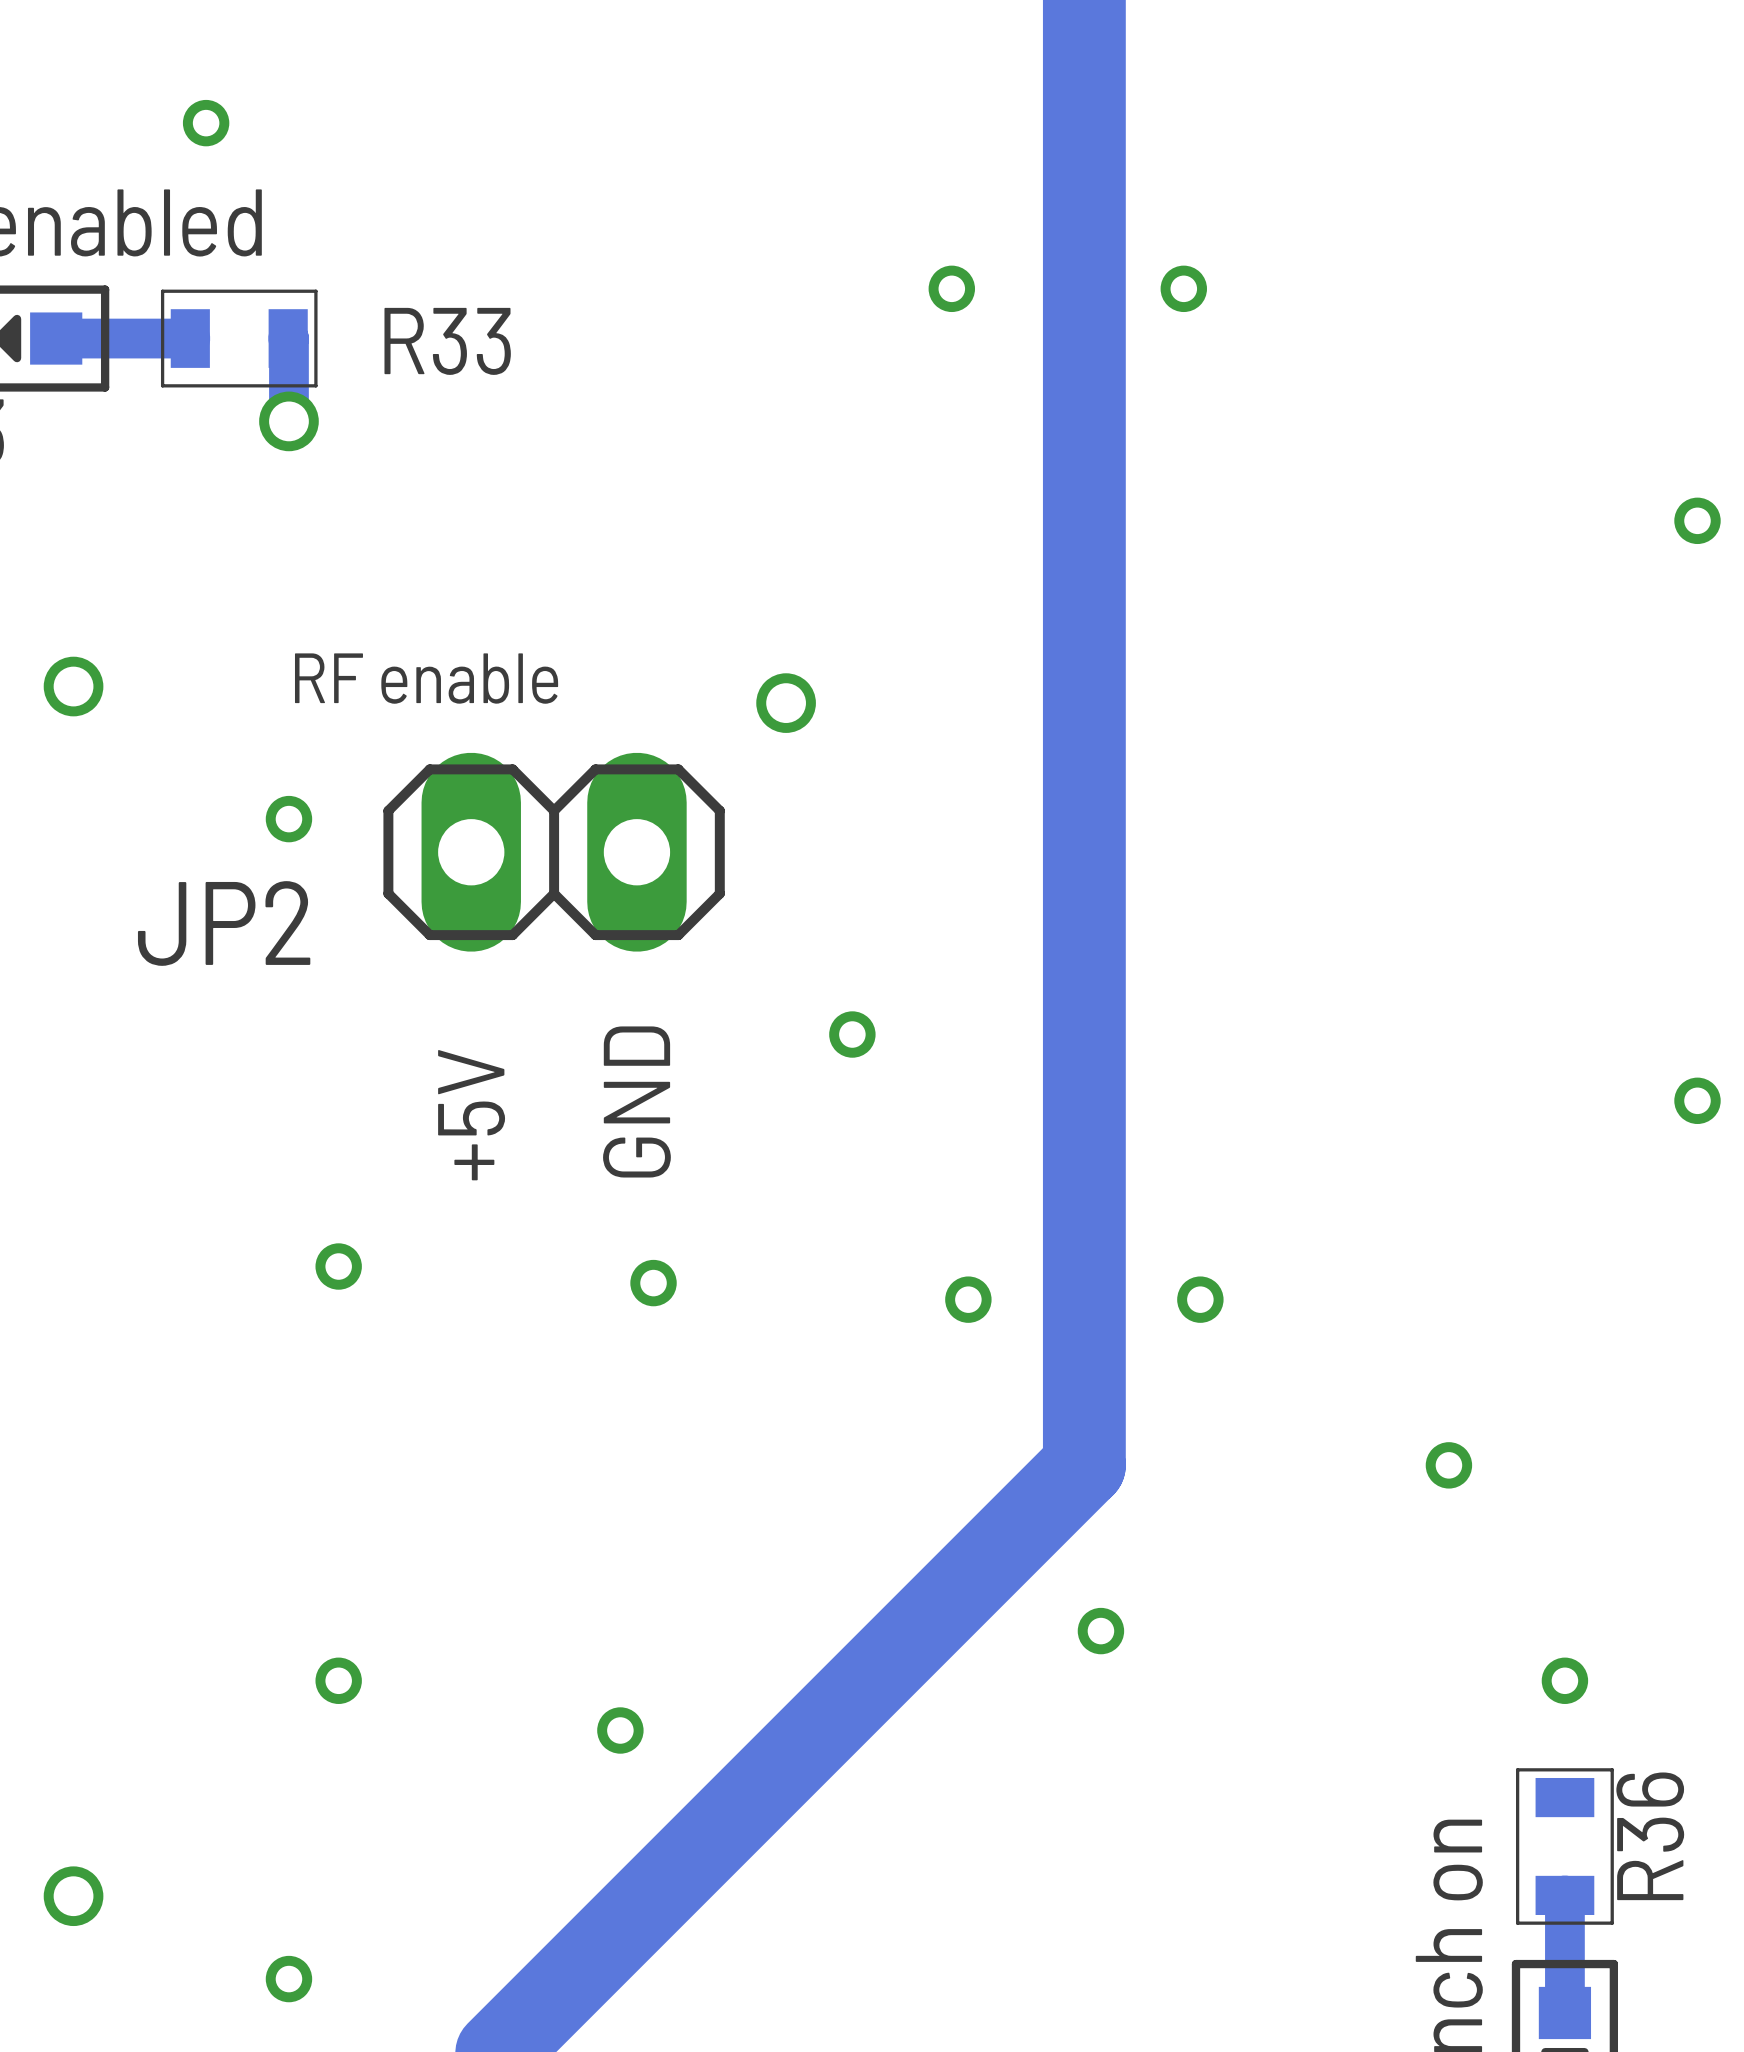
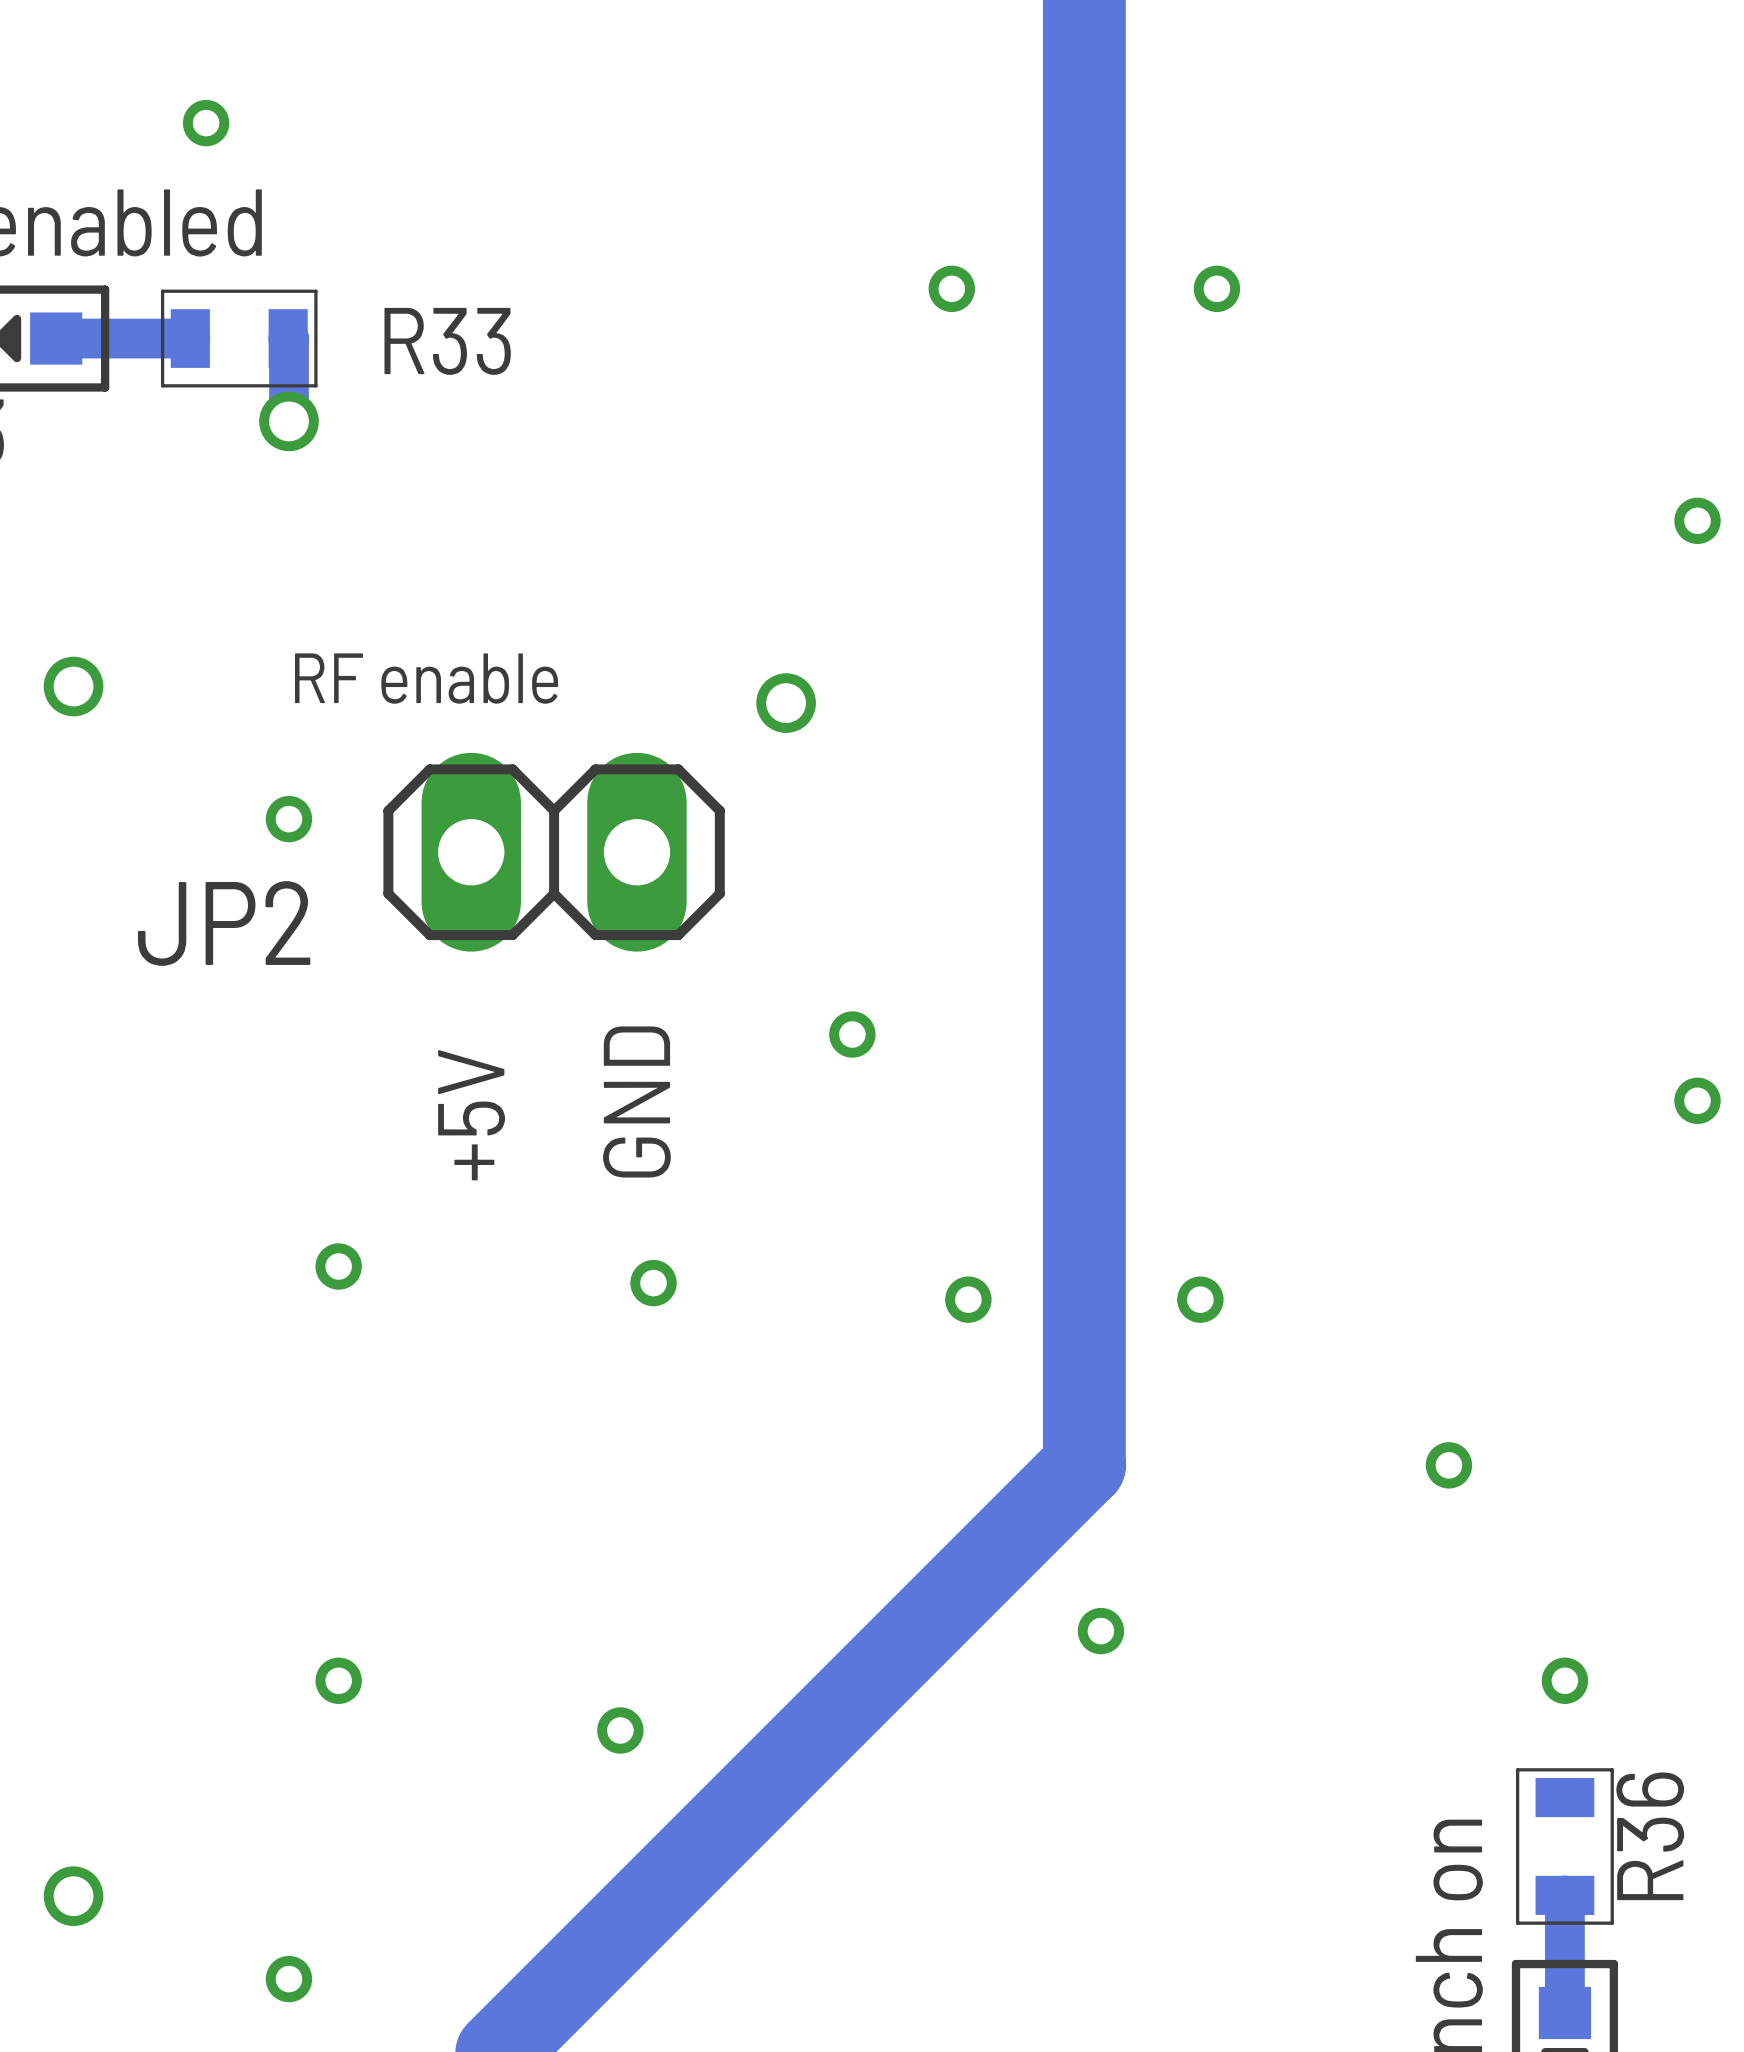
via position: (1183, 288) -> (1216, 288)

